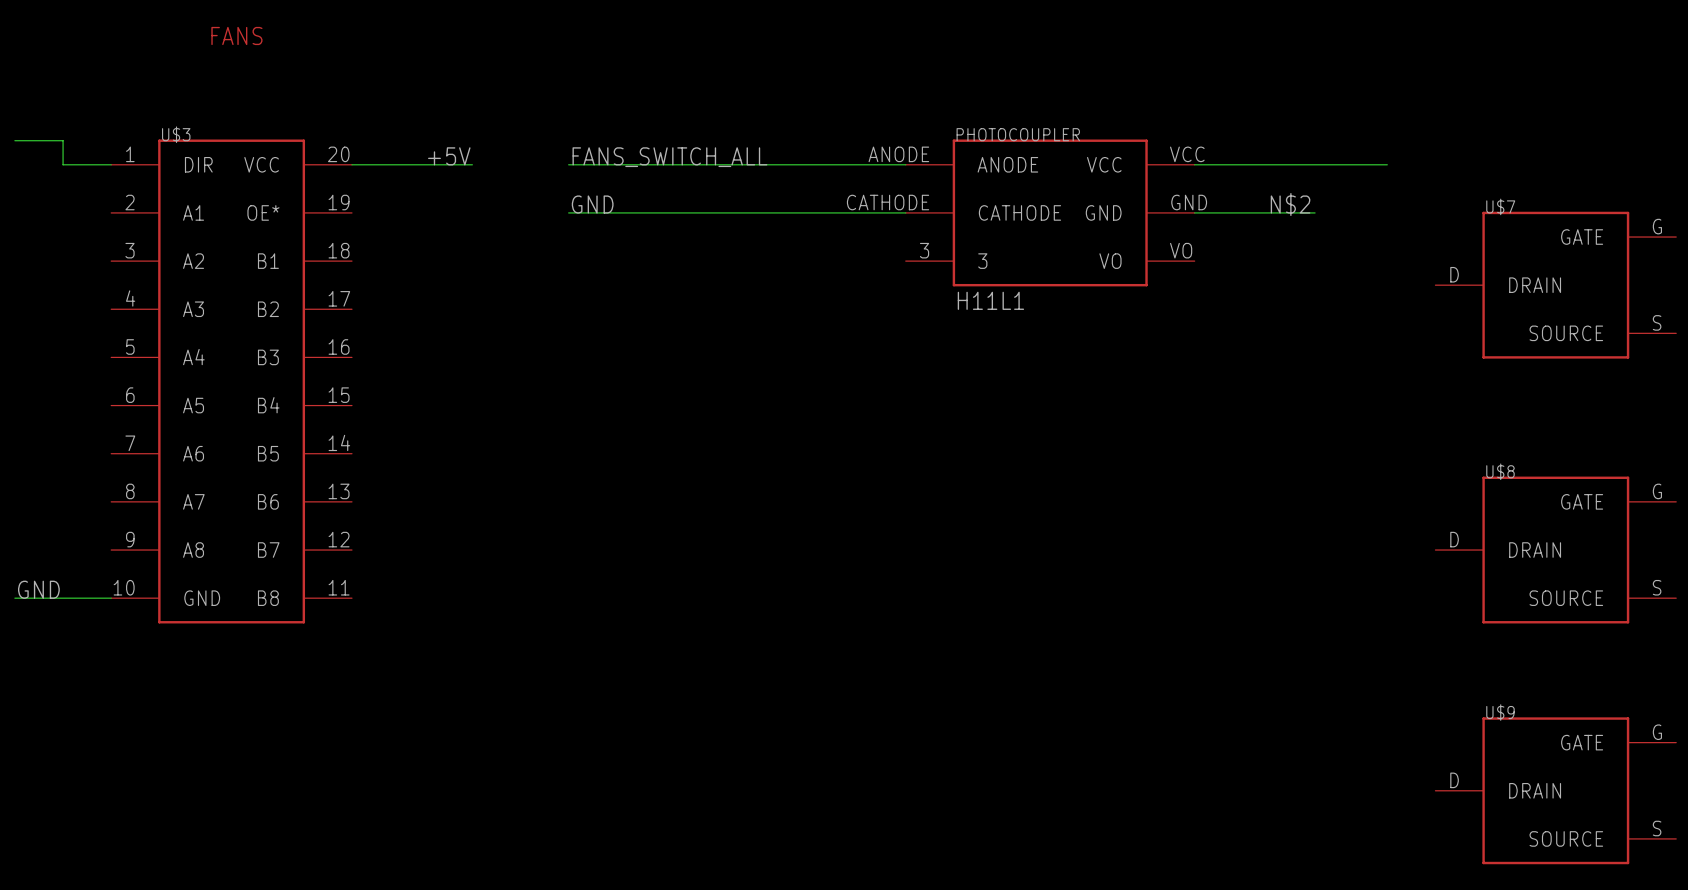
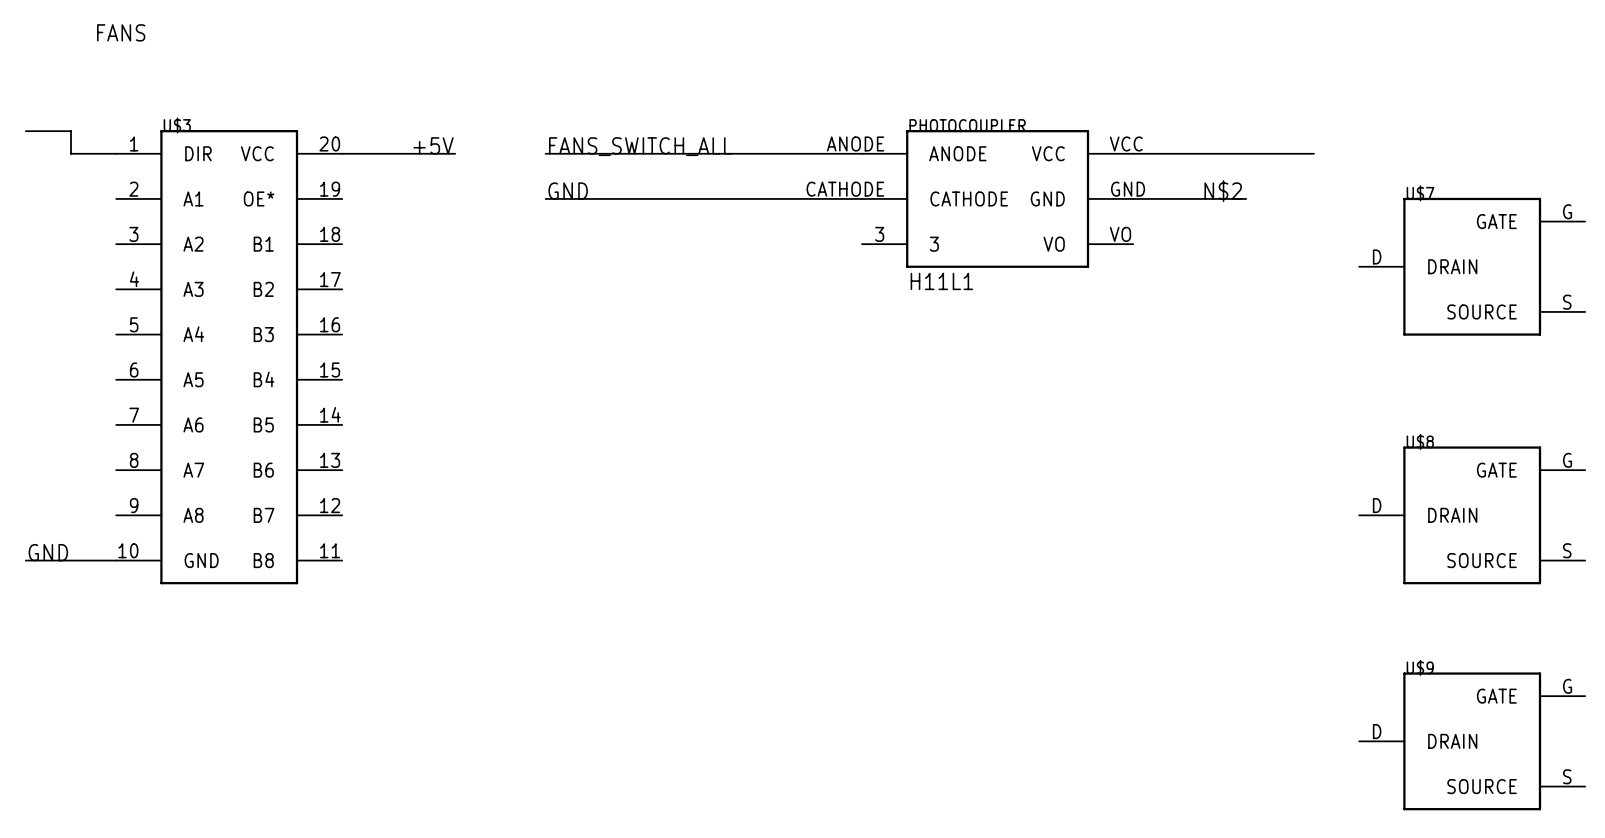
text position: FANS (236, 35) -> FANS (121, 32)

